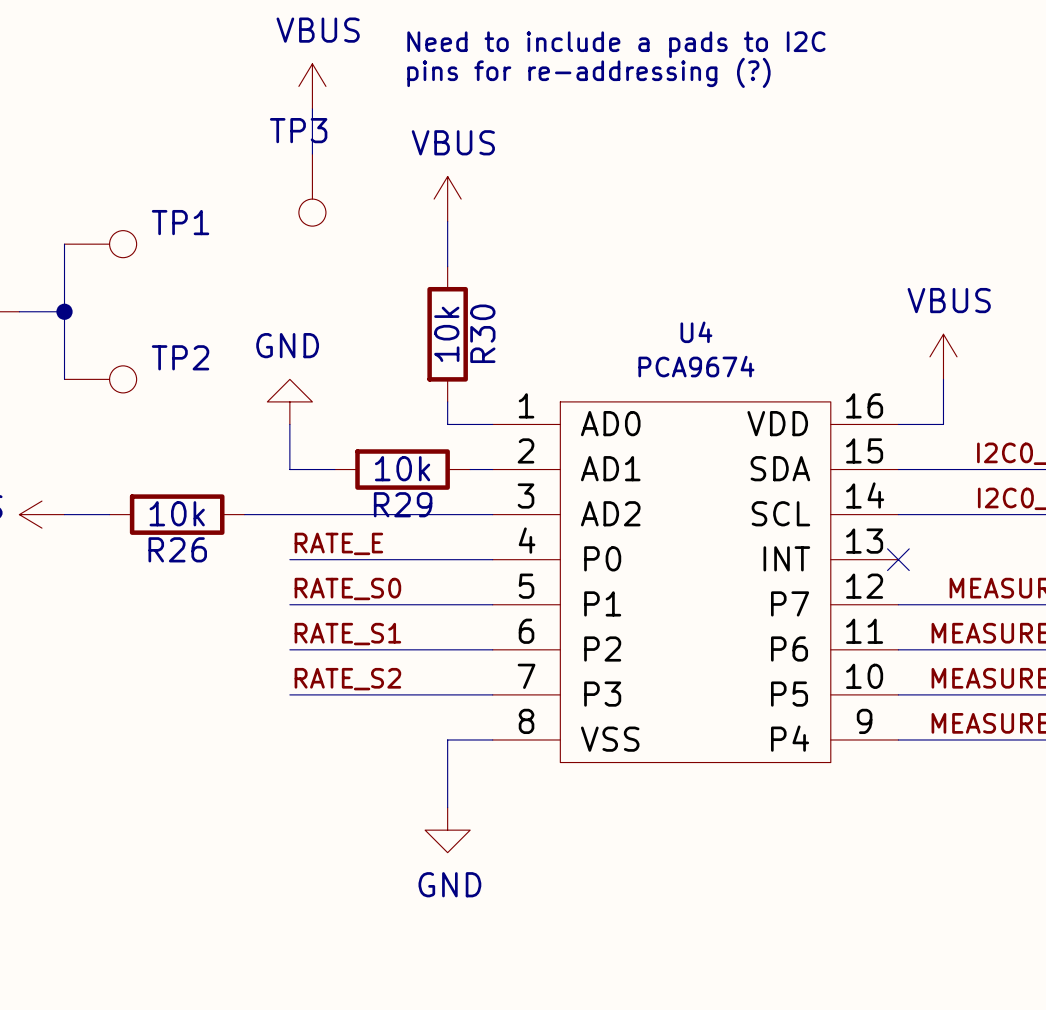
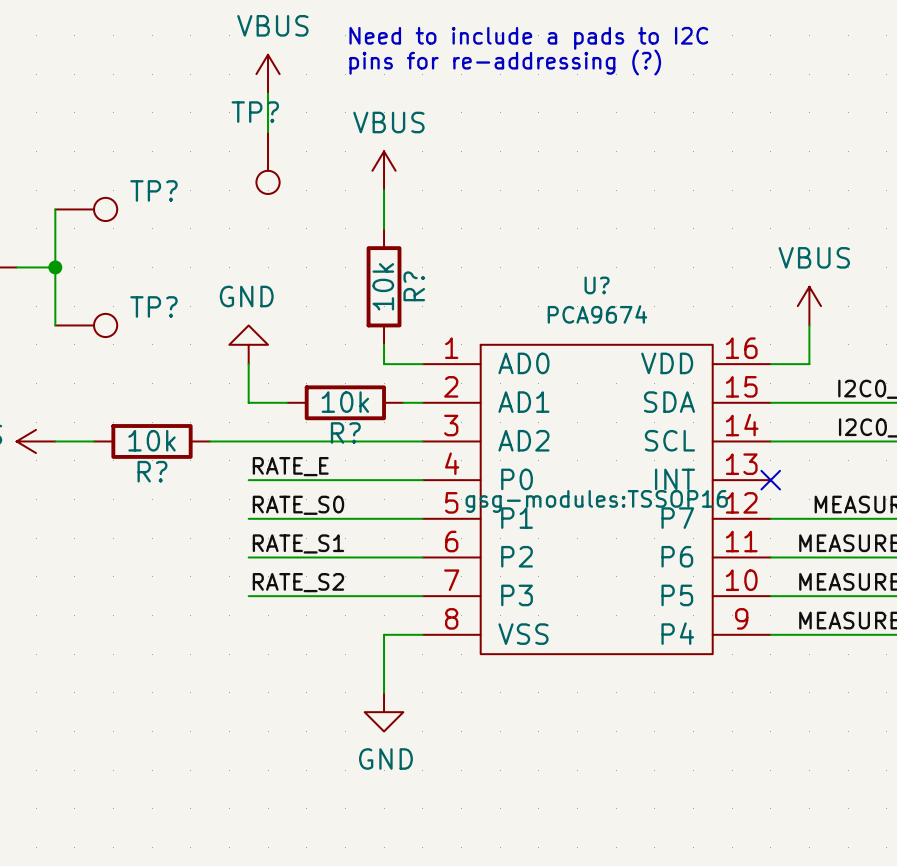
TP3 name: TP3 (298, 130) -> TP? (255, 112)
TP1 name: TP1 (180, 222) -> TP? (153, 190)
U4 name: U4 (696, 332) -> U? (597, 285)
R30 name: R30 (482, 333) -> R? (414, 286)
TP2 name: TP2 (180, 357) -> TP? (153, 306)
R29 name: R29 (403, 504) -> R? (345, 433)
R26 name: R26 (177, 549) -> R? (152, 471)
U4 text: none -> gsg-modules:TSSOP16 (596, 501)

